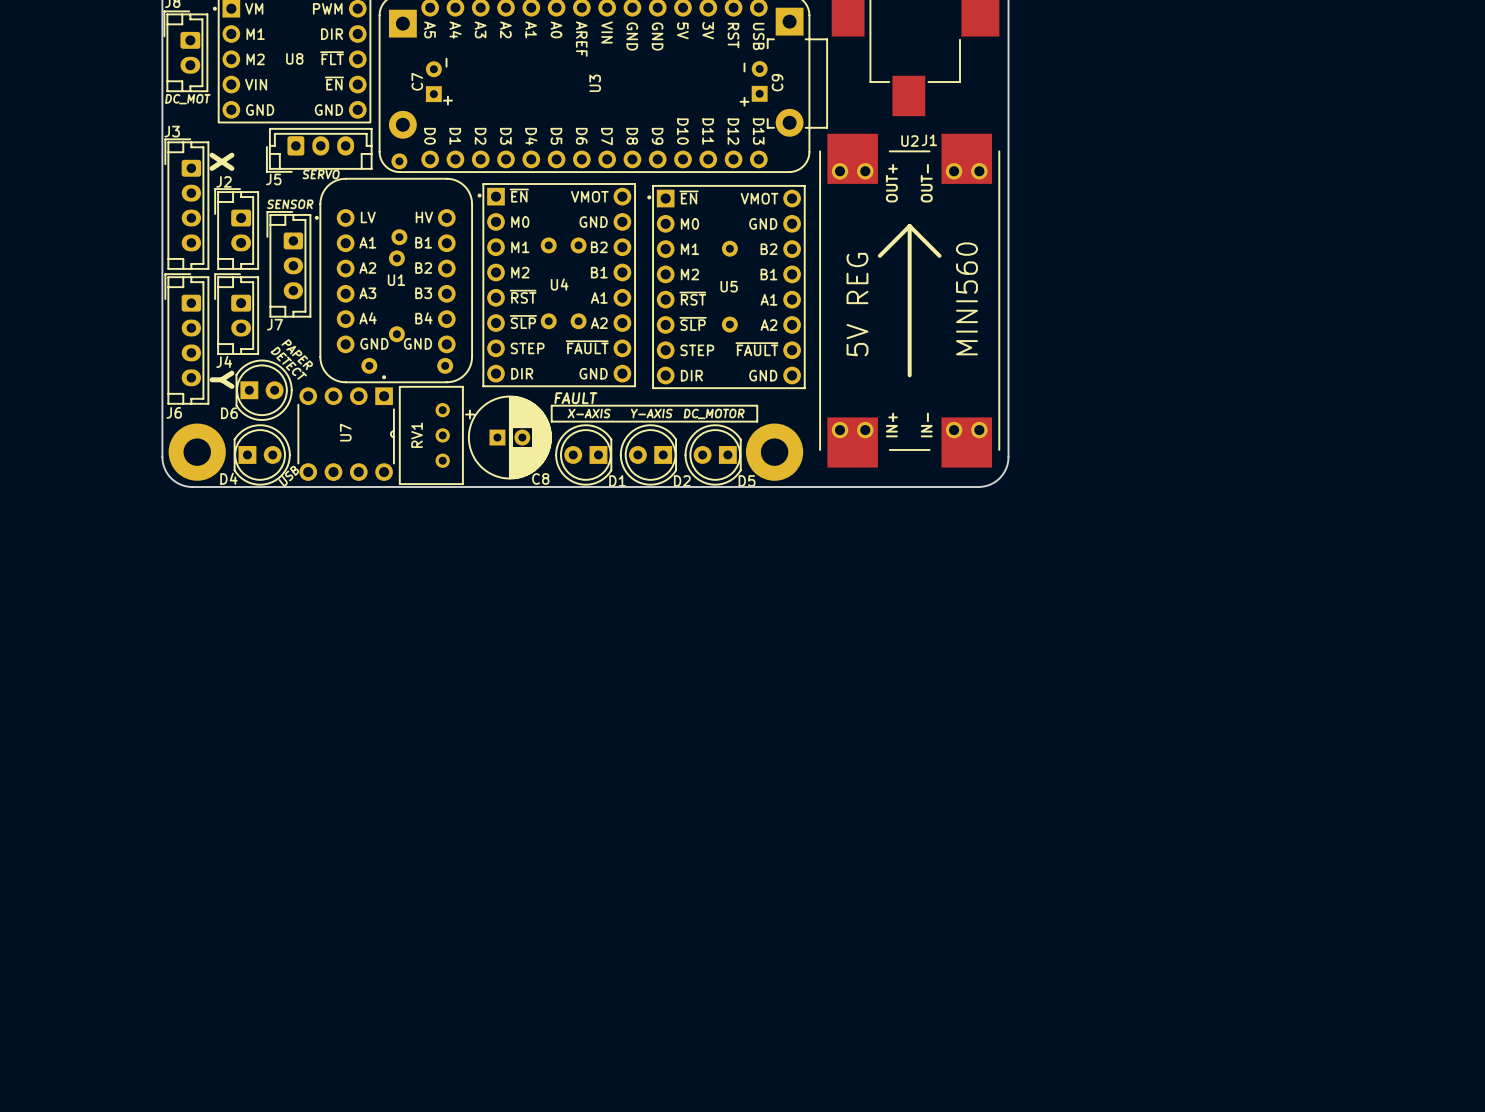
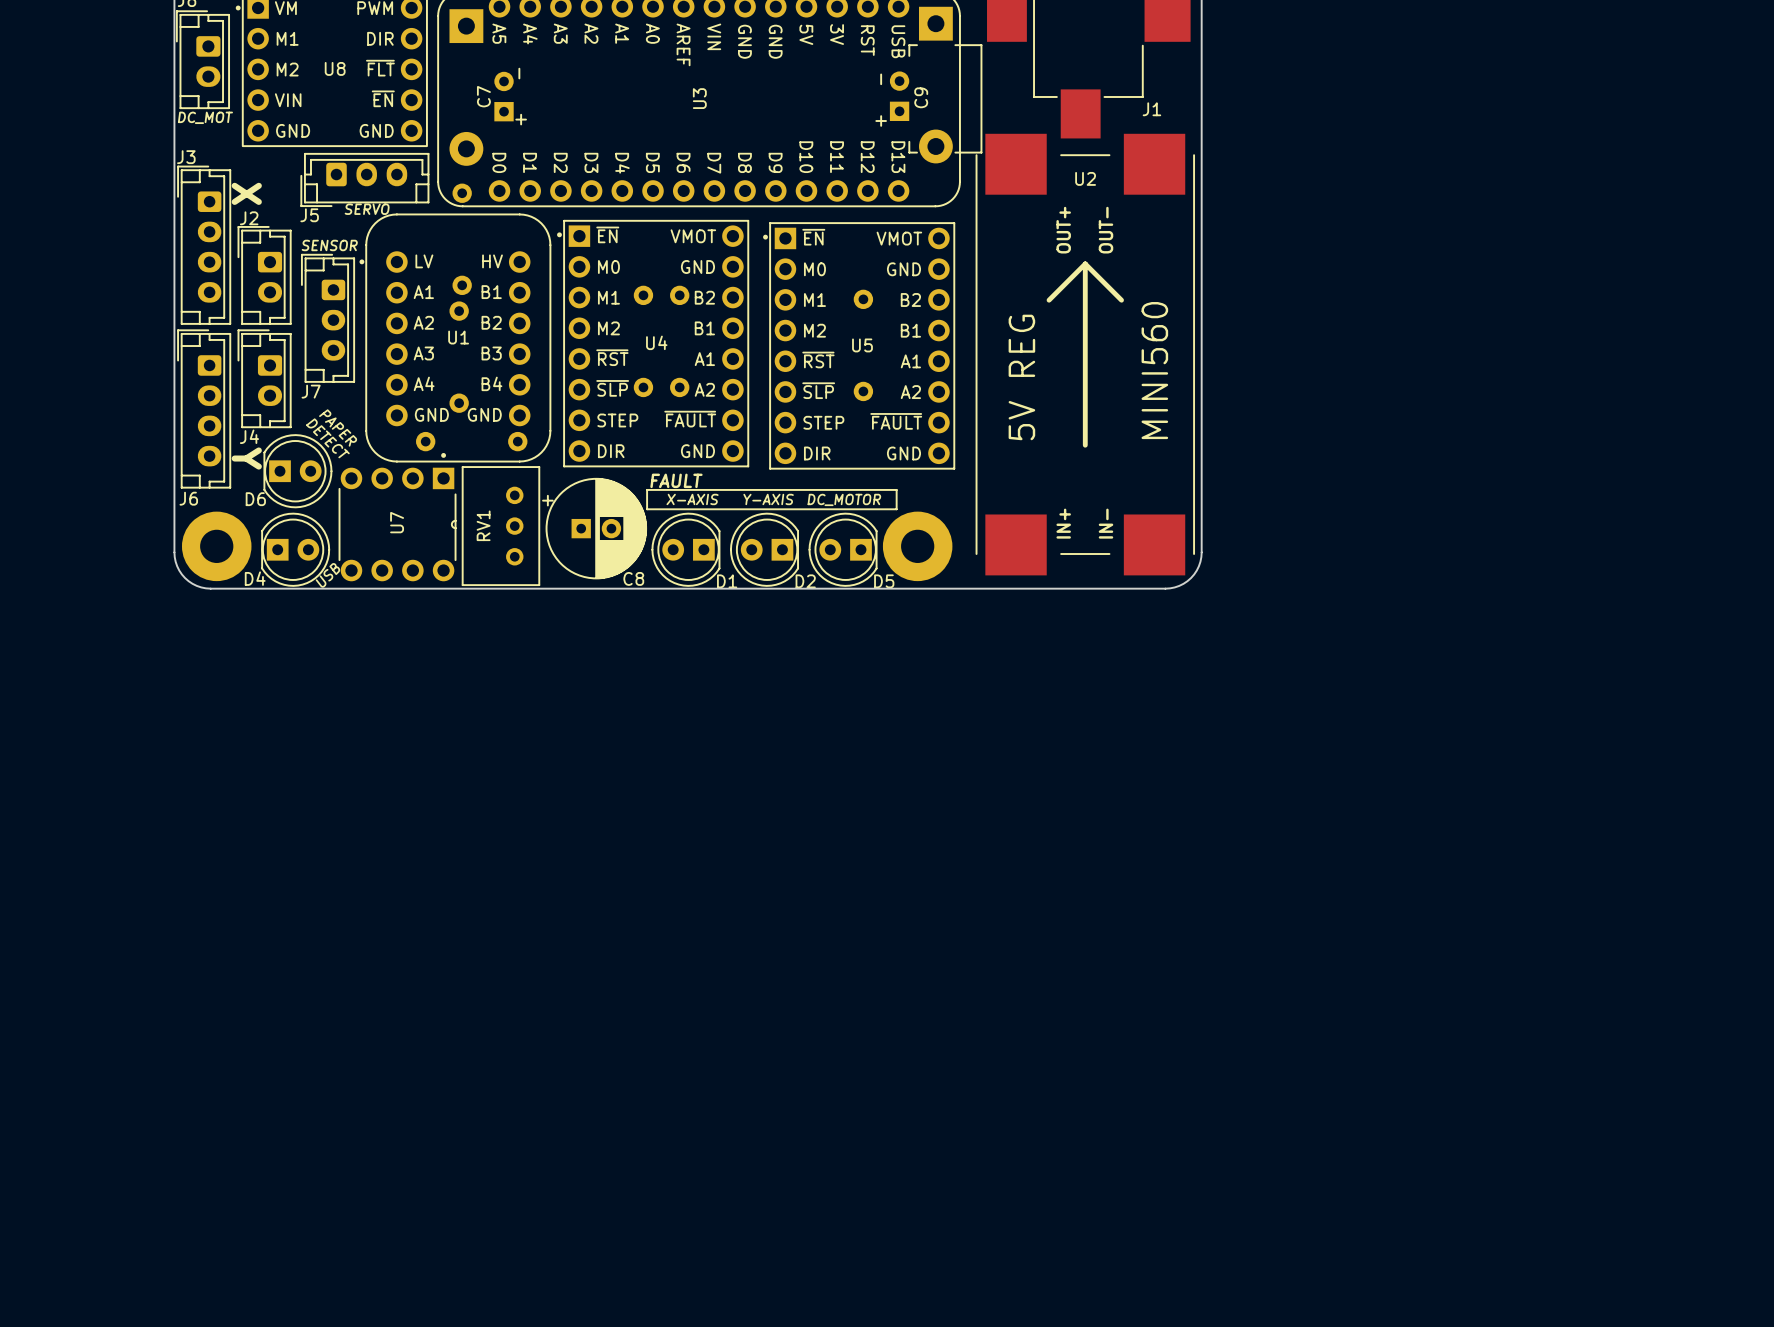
U2 footprint: [819, 133, 1001, 468] -> [975, 133, 1195, 576]
J1 name position: J1 (929, 140) -> J1 (1151, 109)

